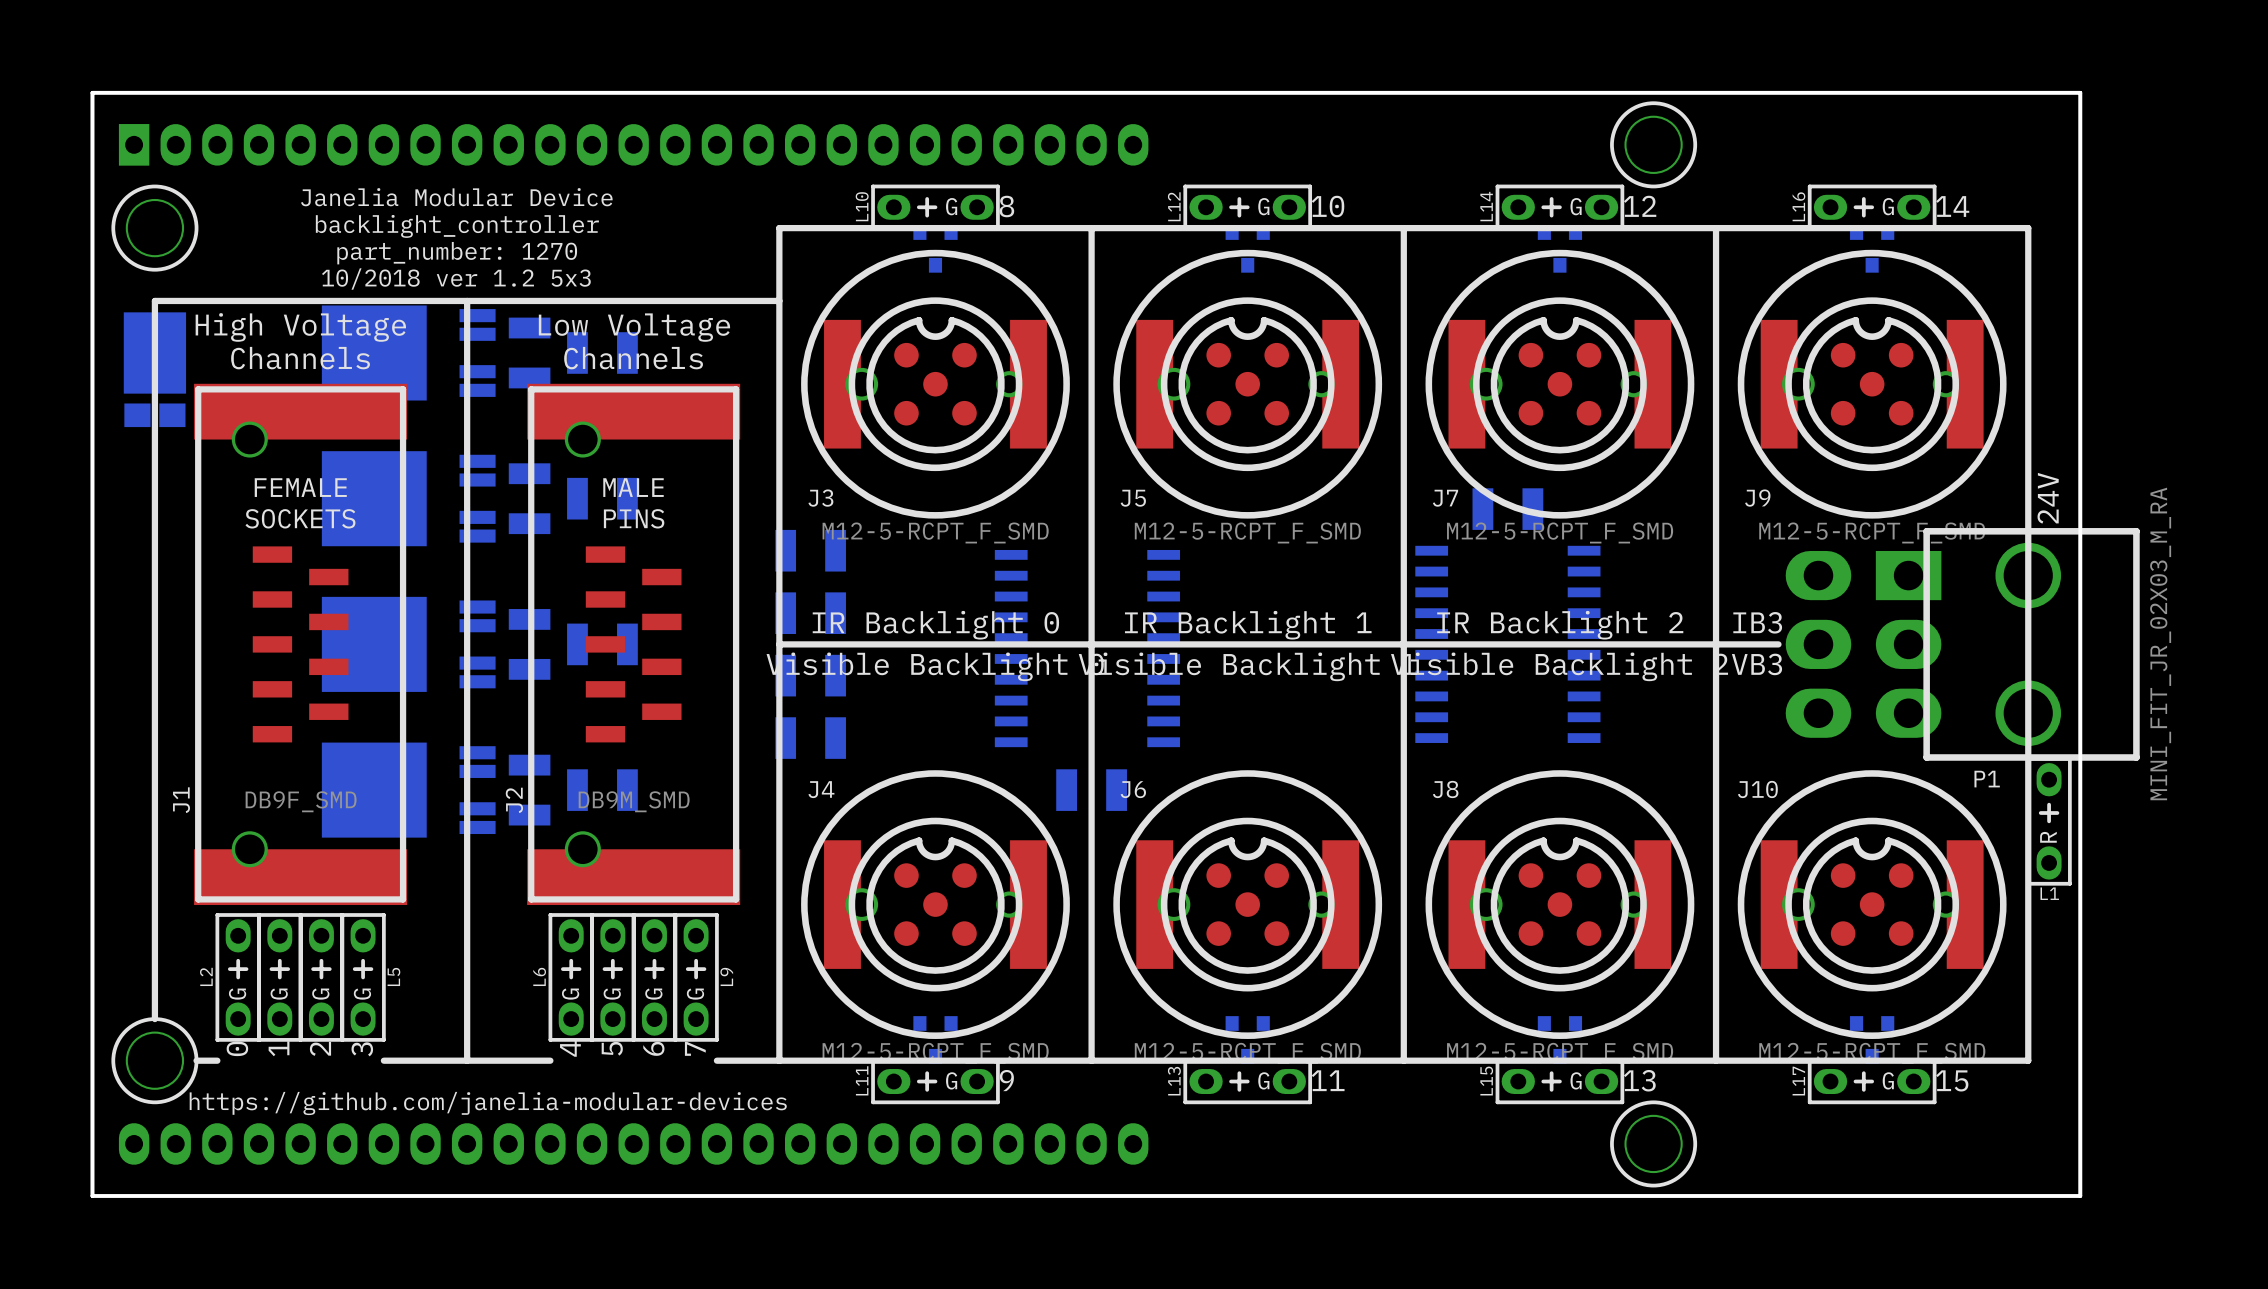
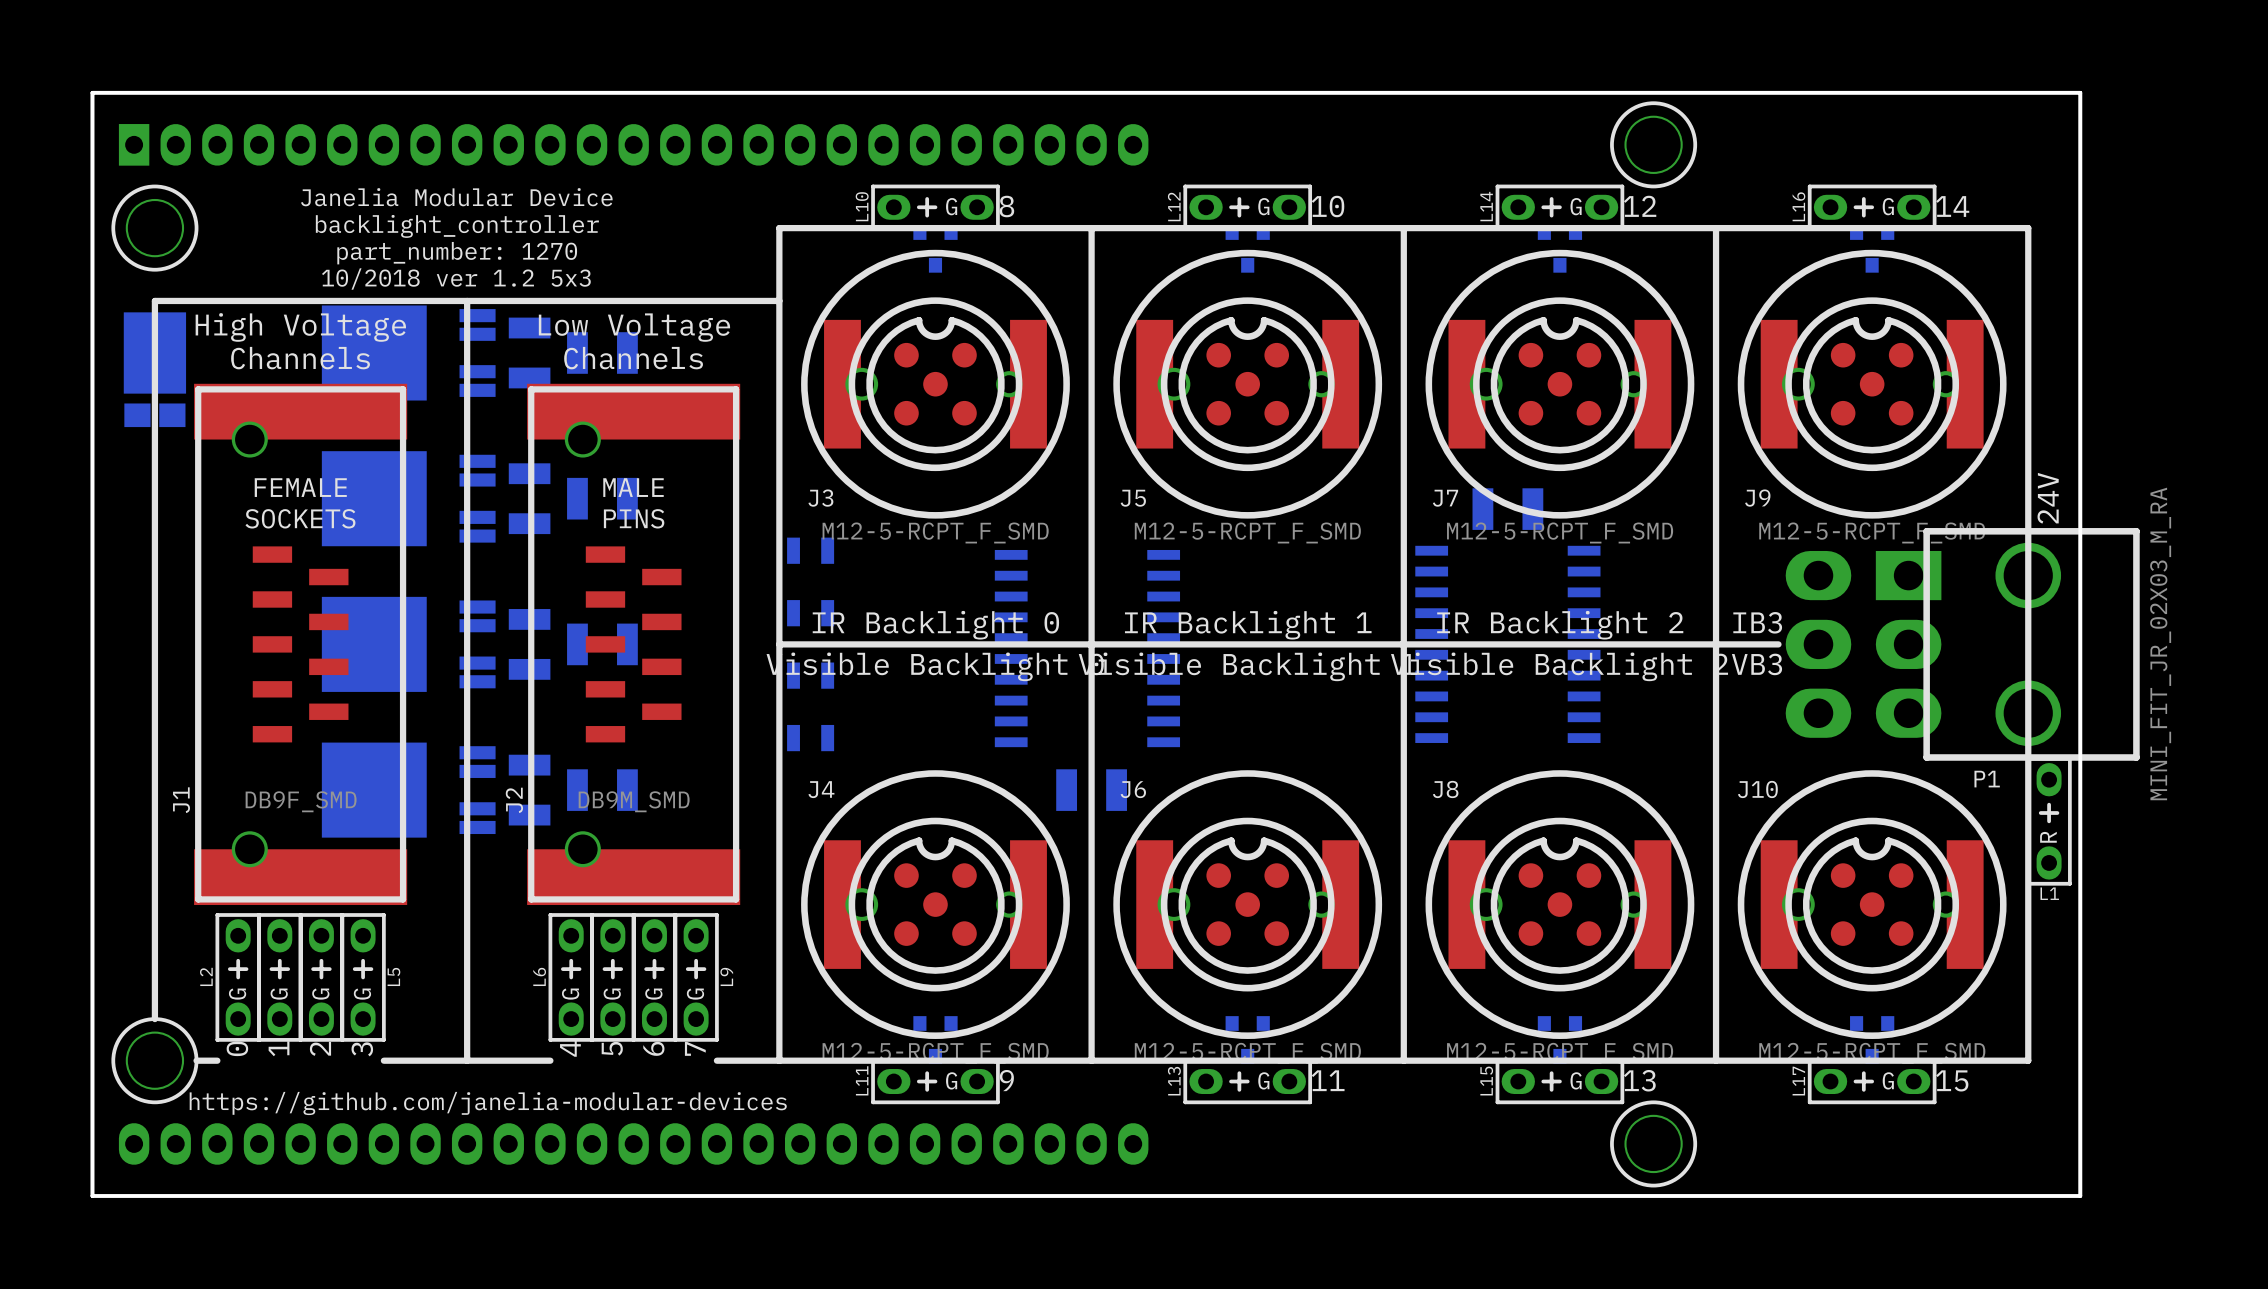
part footprint: [775, 529, 846, 572] -> [787, 537, 835, 564]
part footprint: [775, 592, 846, 634] -> [787, 600, 835, 627]
part footprint: [775, 654, 846, 697] -> [787, 662, 835, 689]
part footprint: [775, 717, 846, 759] -> [787, 724, 835, 752]

